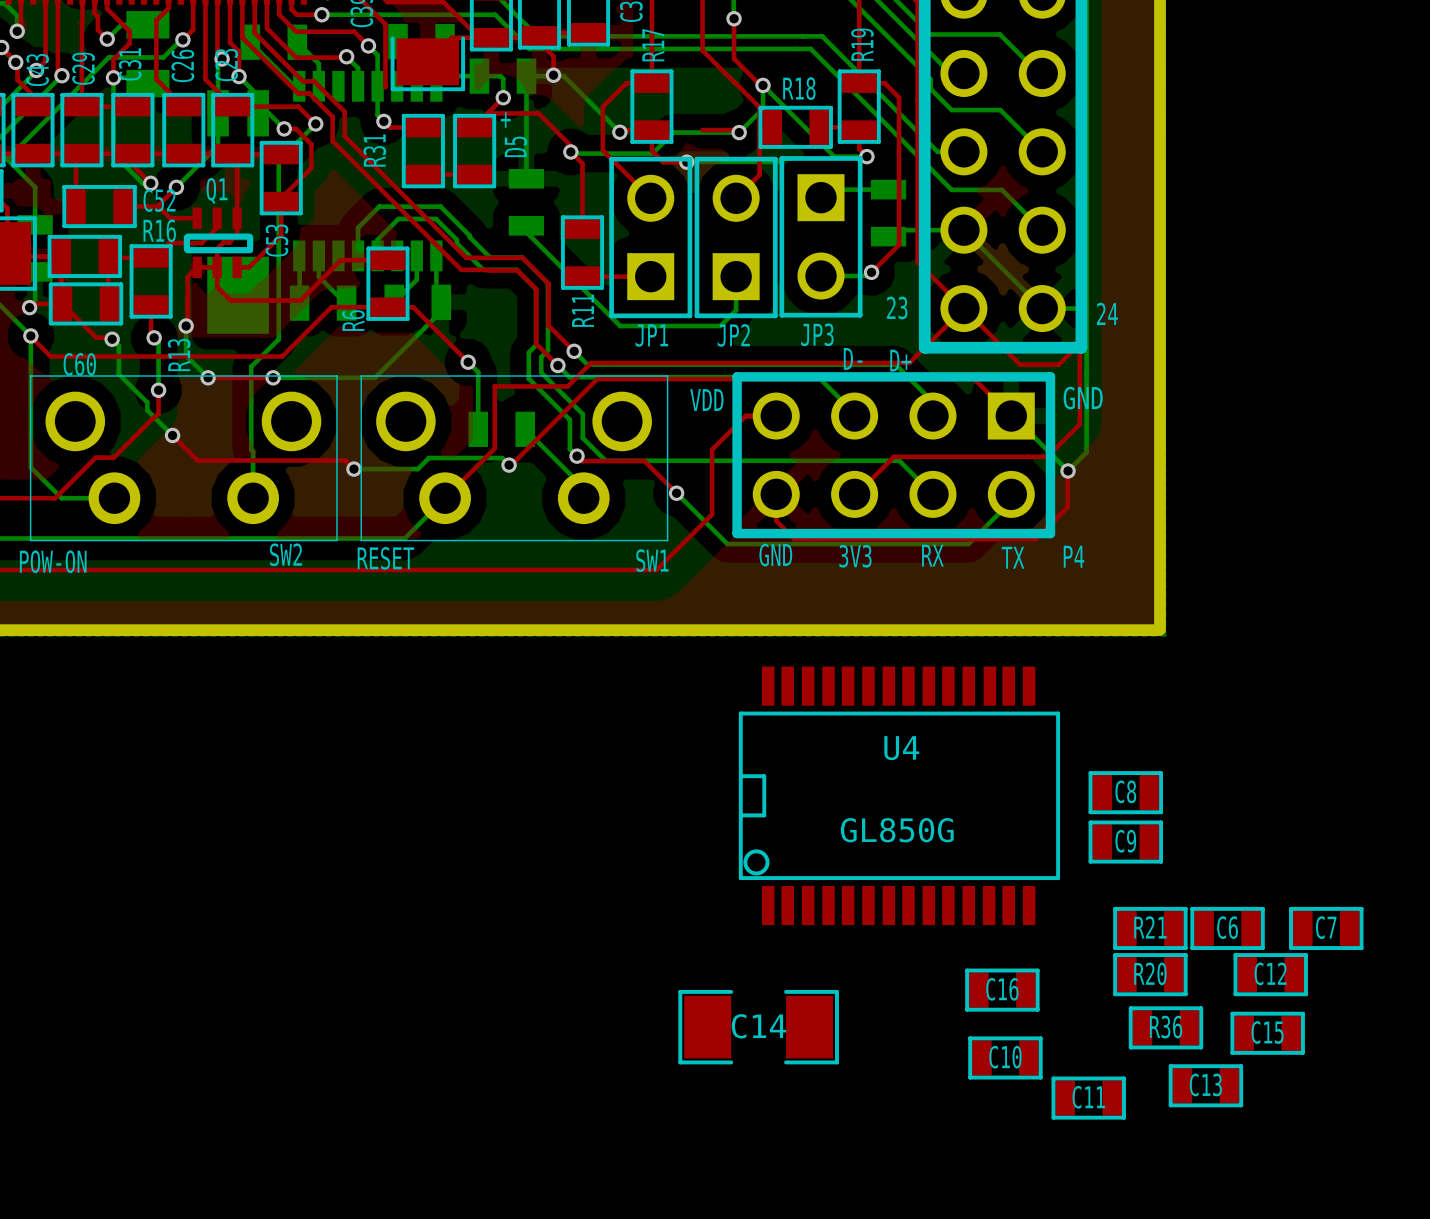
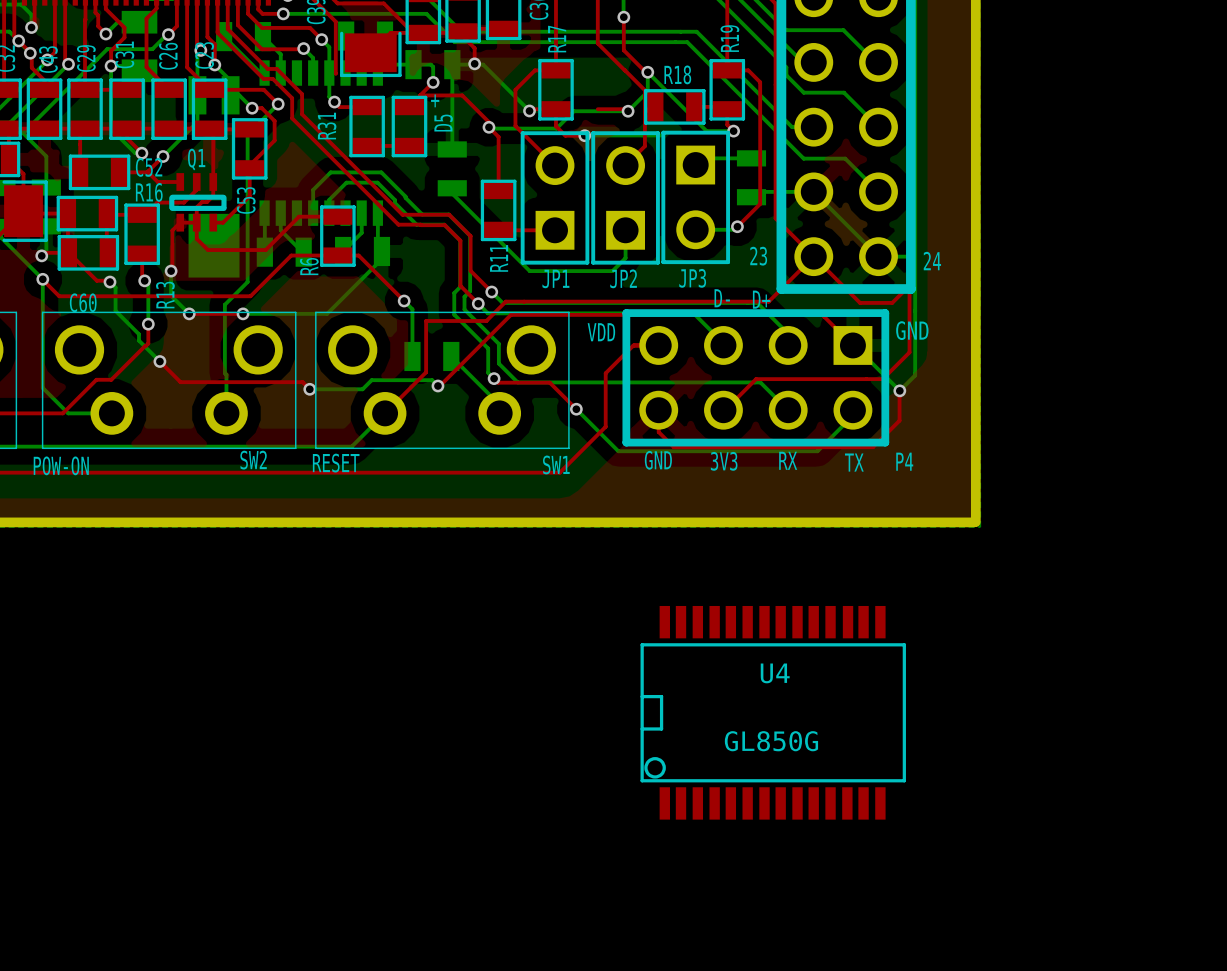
C8: (1125, 792) -> none
U4 position: (899, 795) -> (773, 712)
C9: (1125, 842) -> none
R21: (1150, 928) -> none
C6: (1227, 928) -> none
C7: (1326, 928) -> none
R20: (1150, 974) -> none
C12: (1270, 974) -> none
C16: (1002, 990) -> none
C14: (758, 1027) -> none
R36: (1165, 1027) -> none
C15: (1267, 1033) -> none
C10: (1005, 1057) -> none
C13: (1205, 1085) -> none
C11: (1088, 1098) -> none

